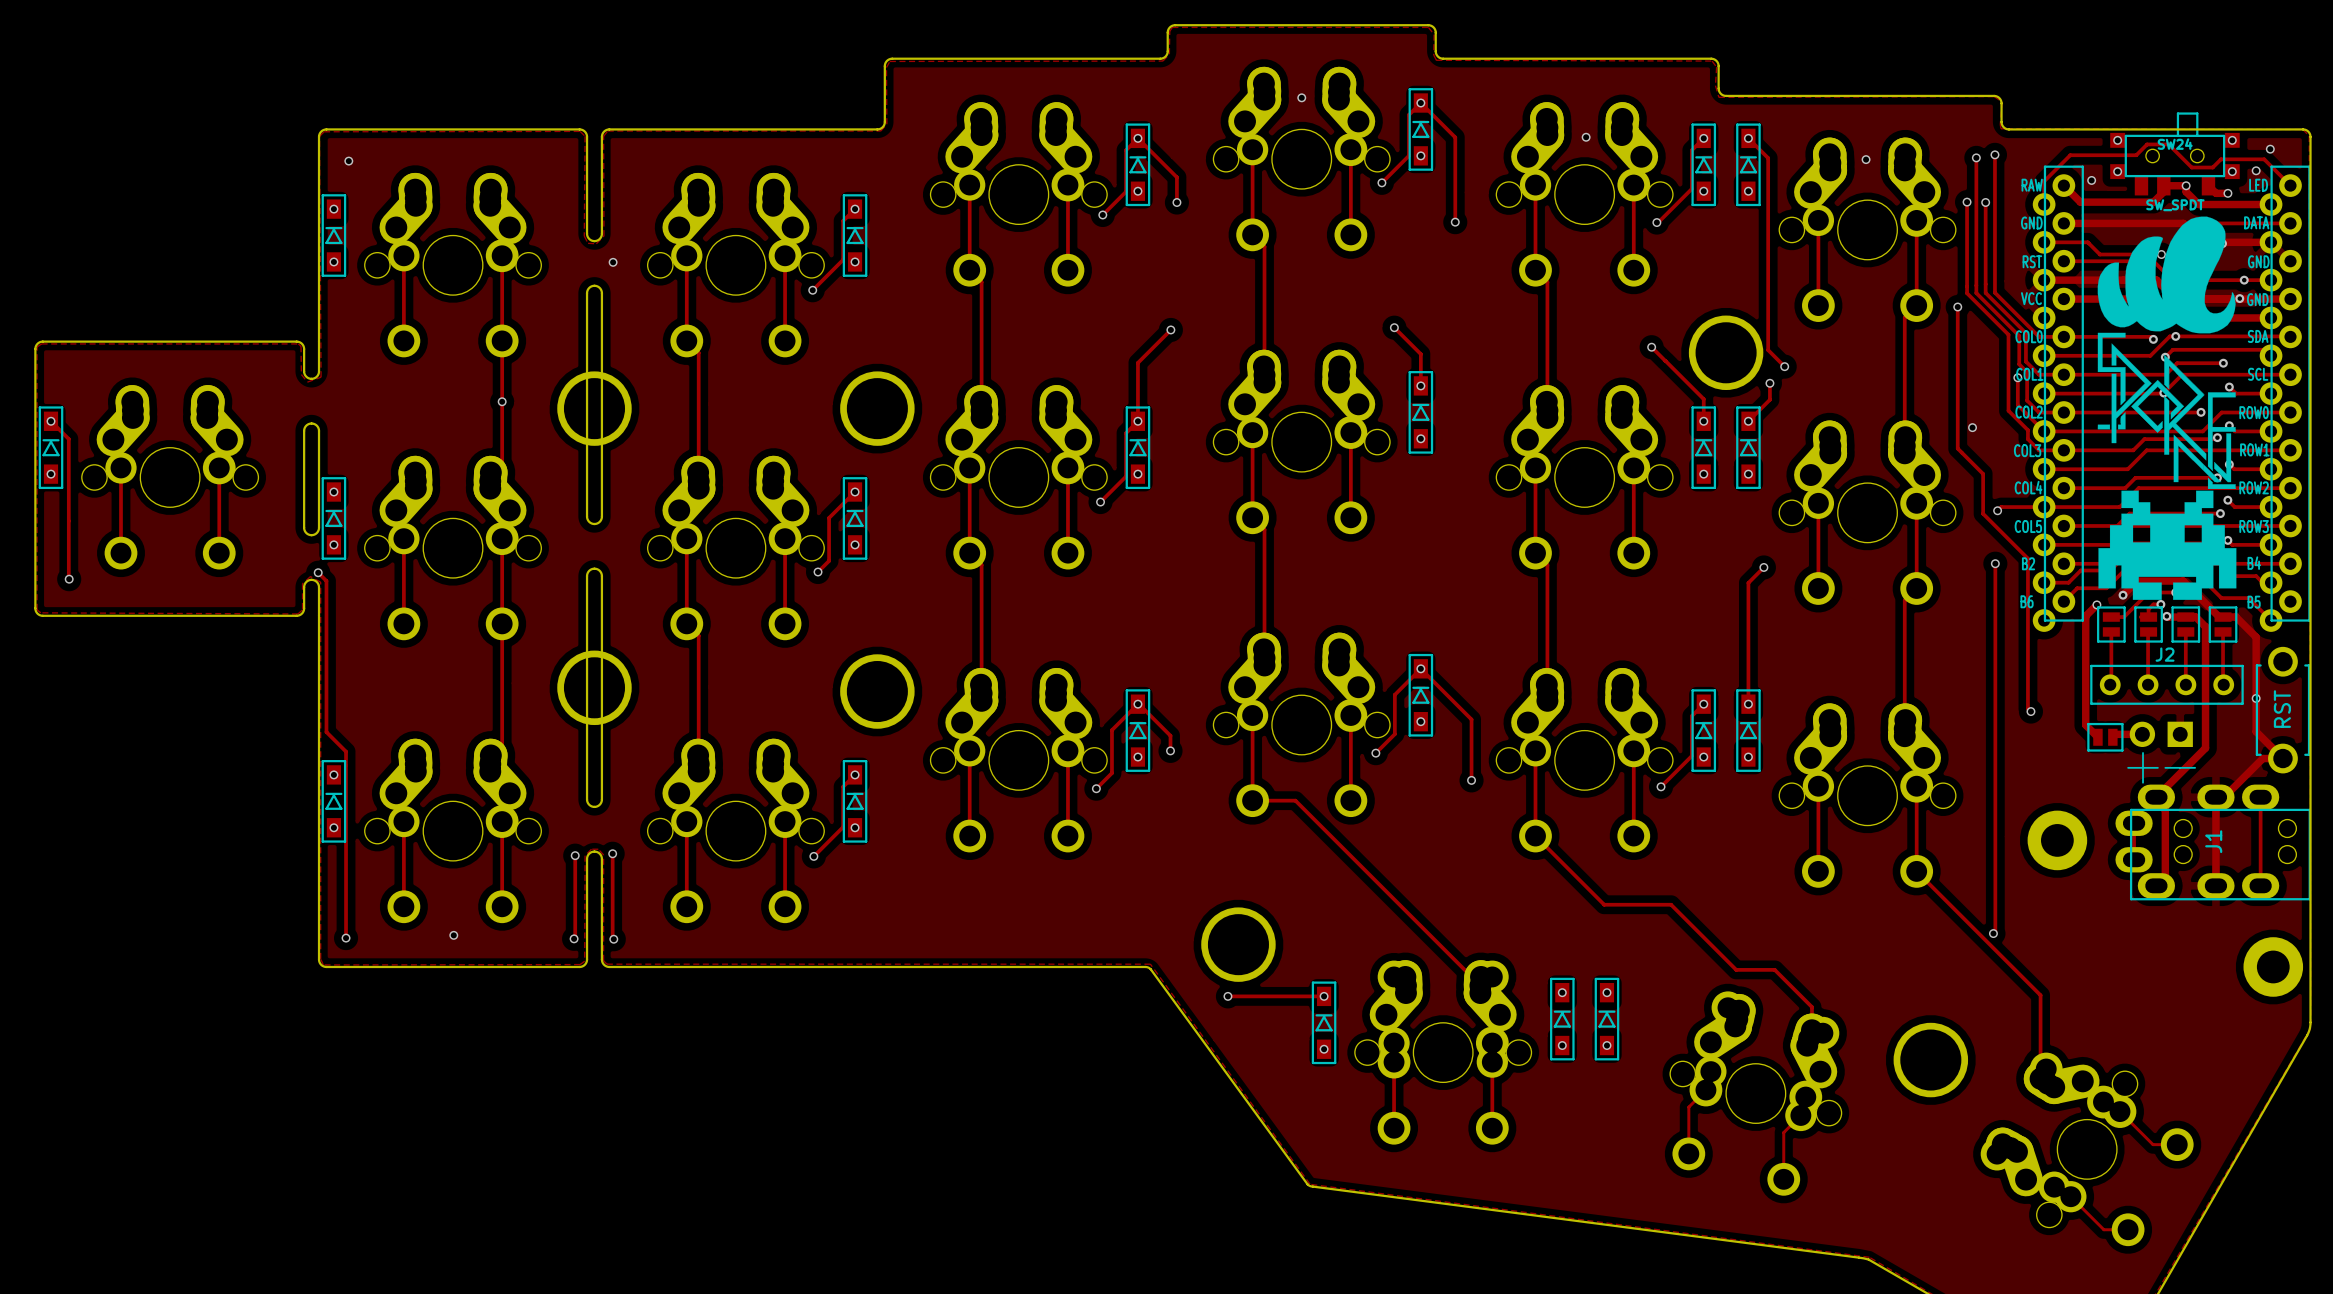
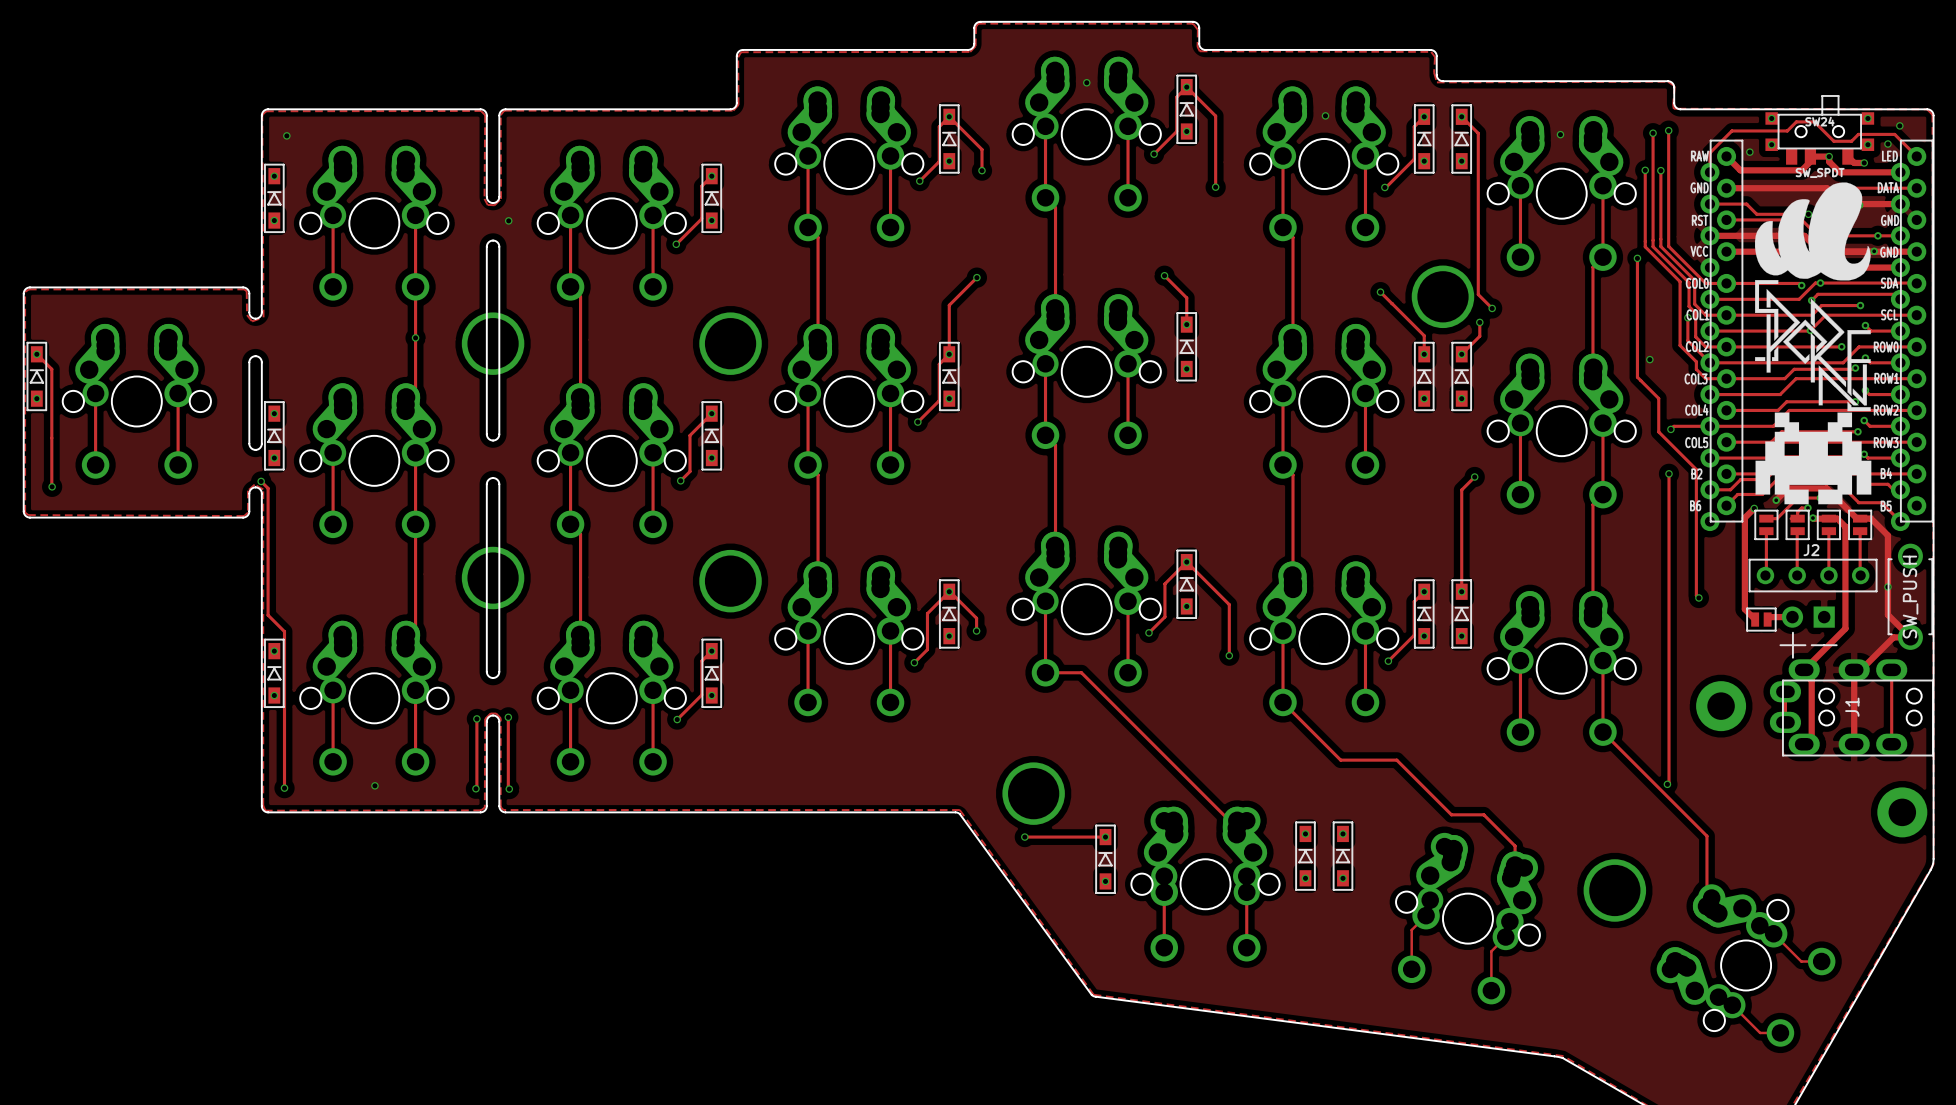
part value: RST (2282, 709) -> SW_PUSH (1910, 597)

